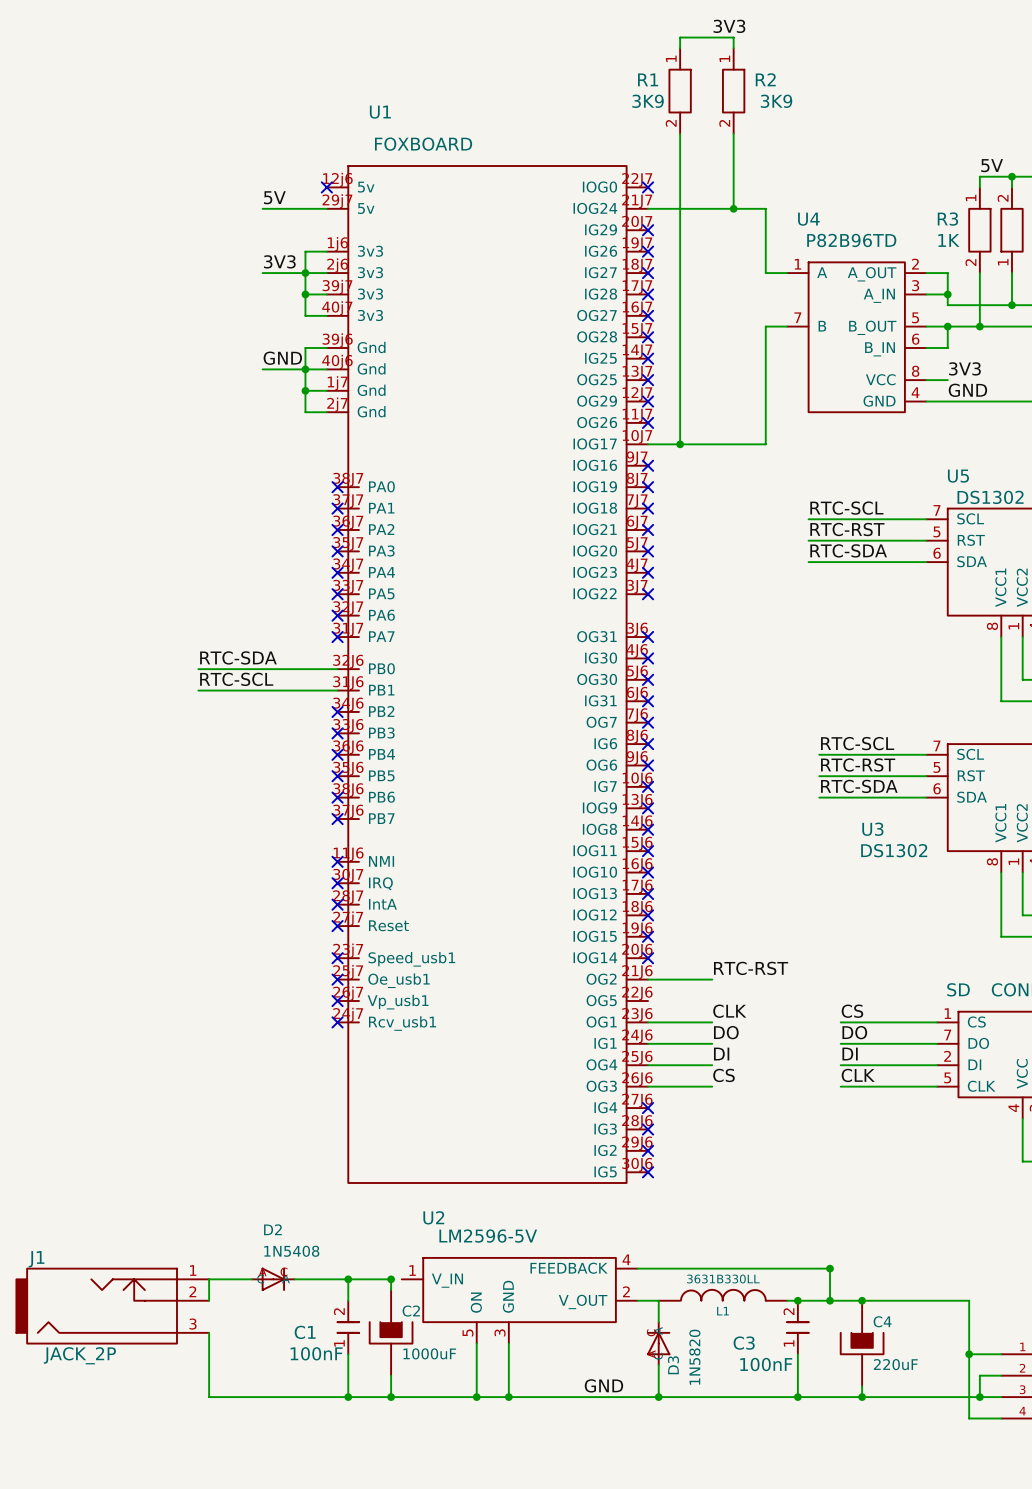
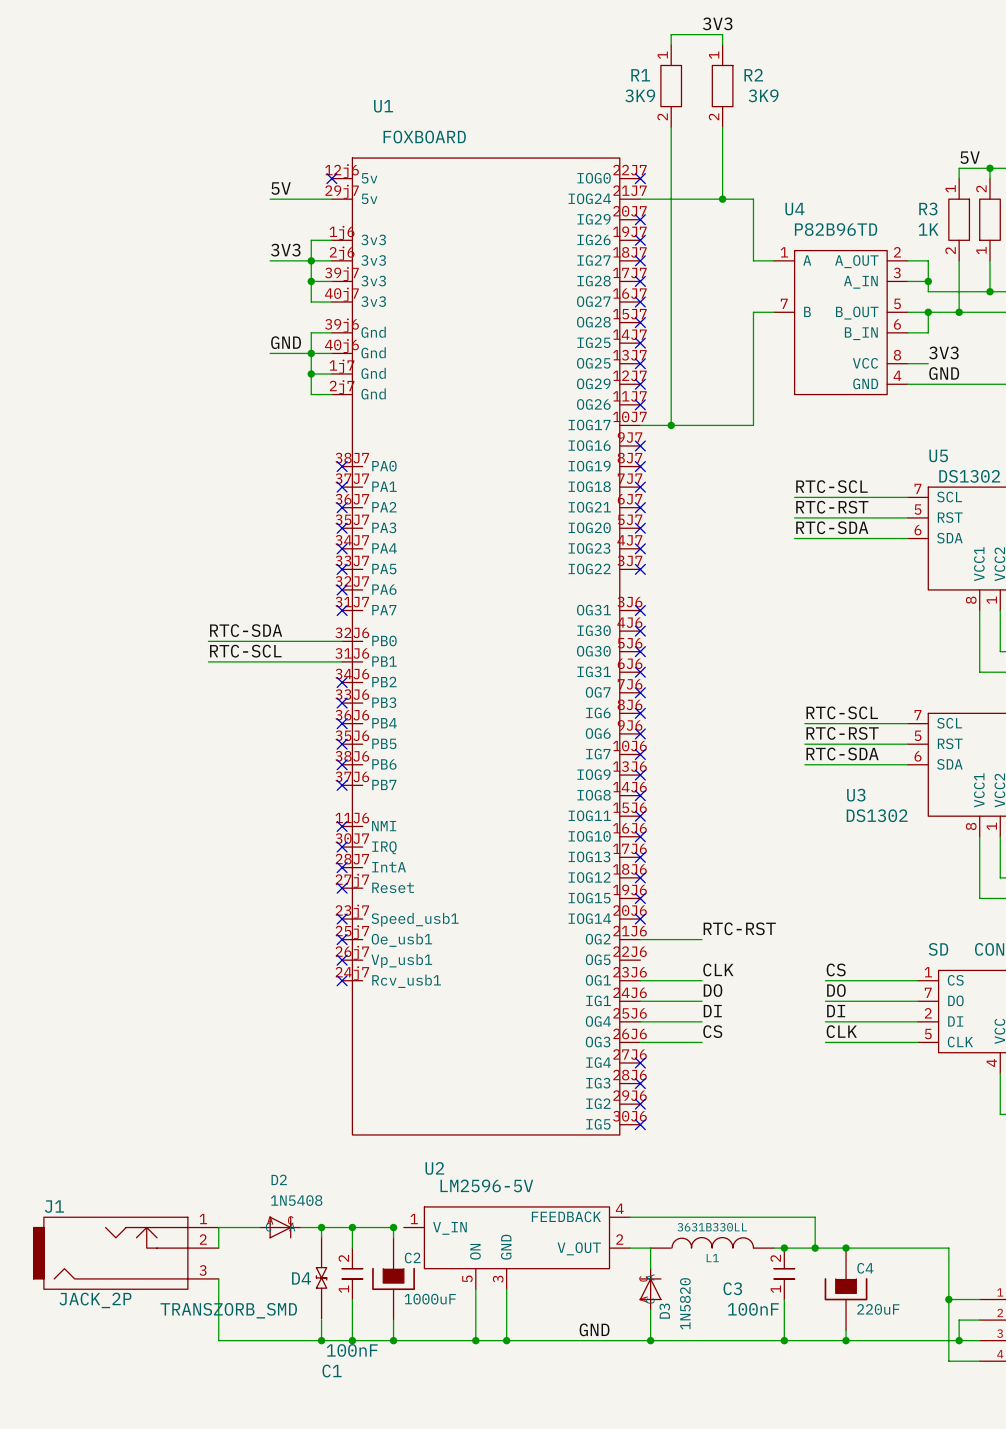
junction: (830, 1268) -> none
wire: none -> (321, 1227) (321, 1237)
junction: none -> (321, 1227)
D4: none -> TRANSZORB_SMD (321, 1277)
C1 name position: C1 (305, 1332) -> C1 (332, 1371)
C1 value position: 100nF (316, 1353) -> 100nF (352, 1350)
wire: none -> (321, 1320) (321, 1340)
junction: none -> (321, 1340)

